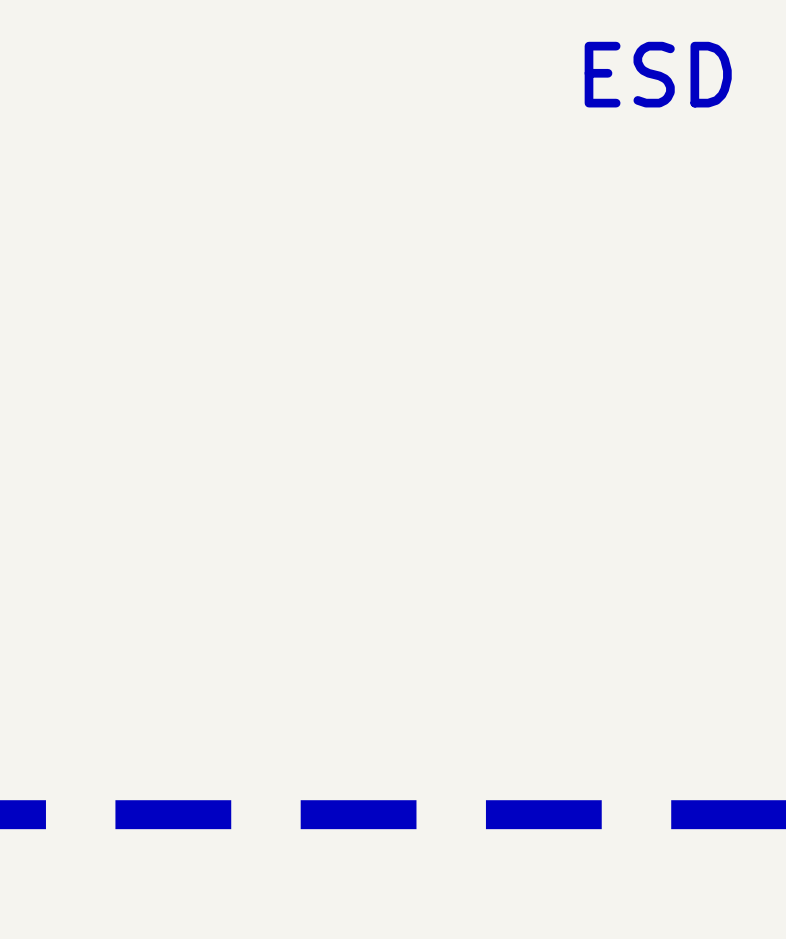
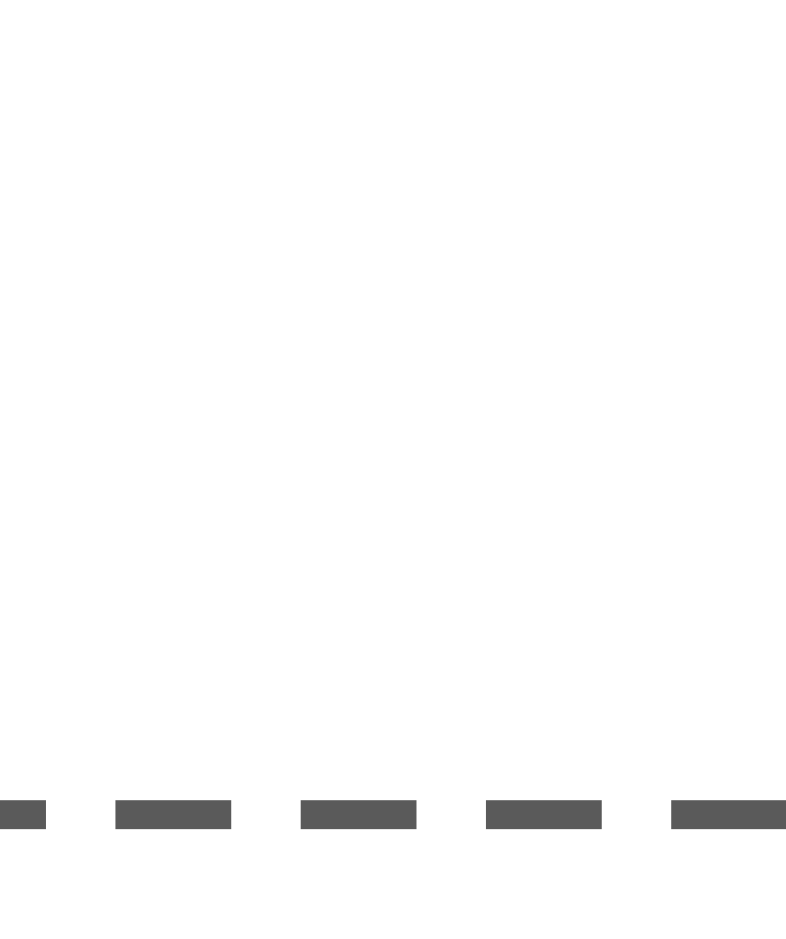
text: ESD (658, 74) -> none

